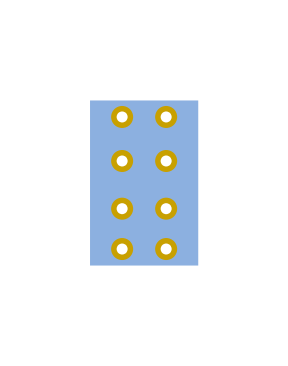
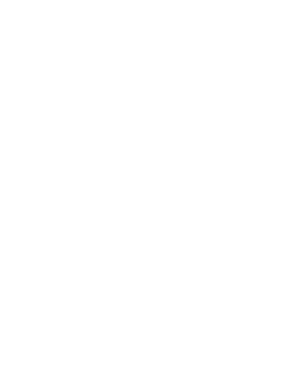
part: (144, 183) -> none

